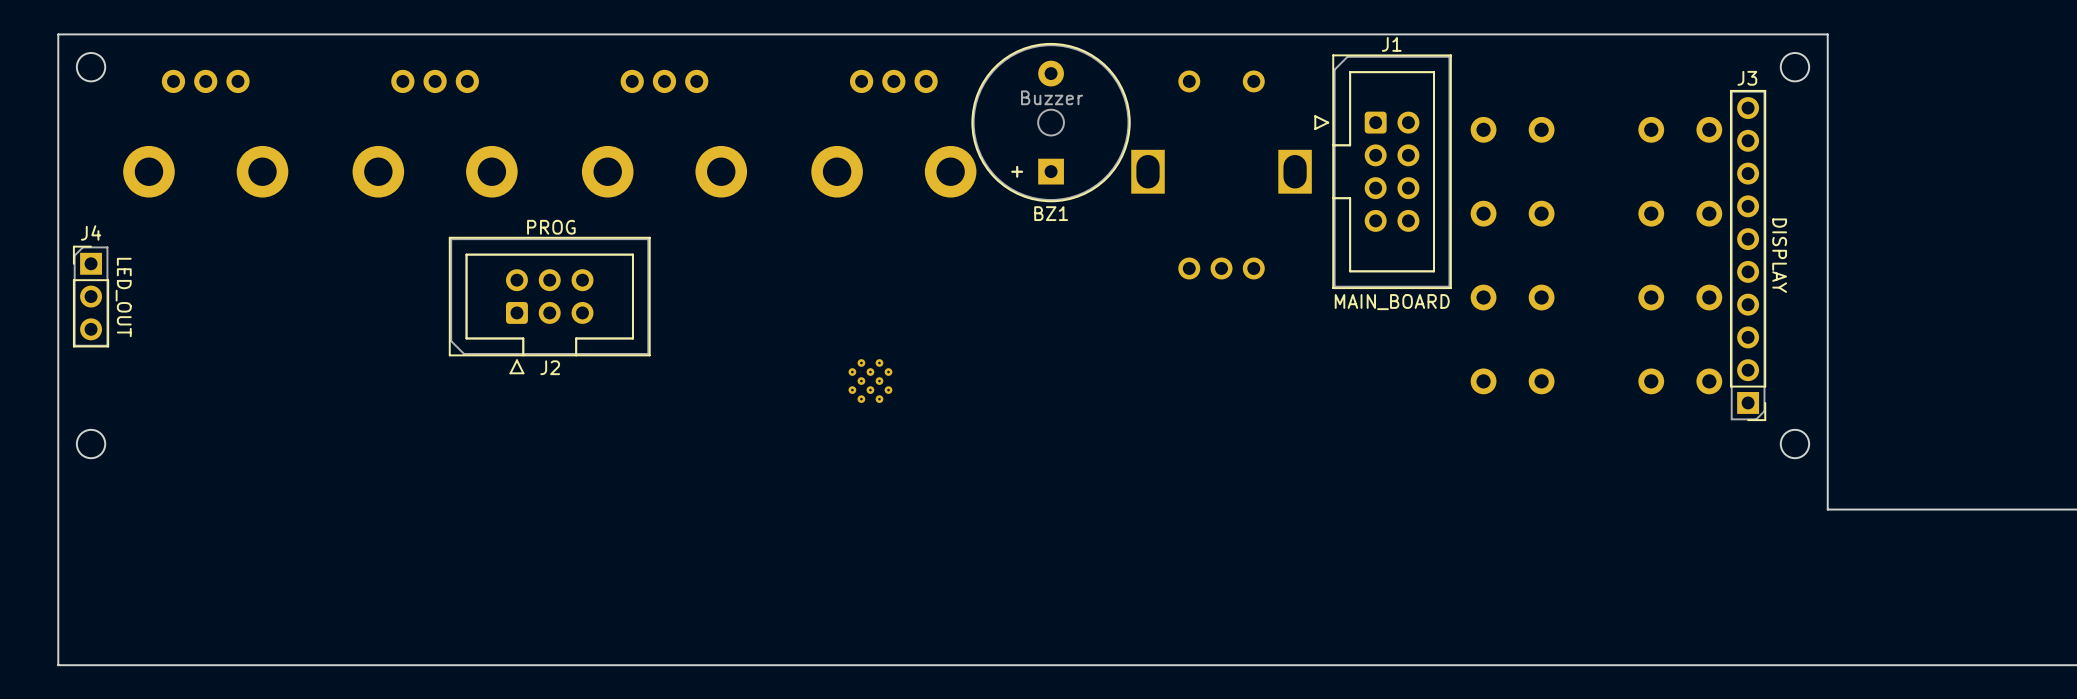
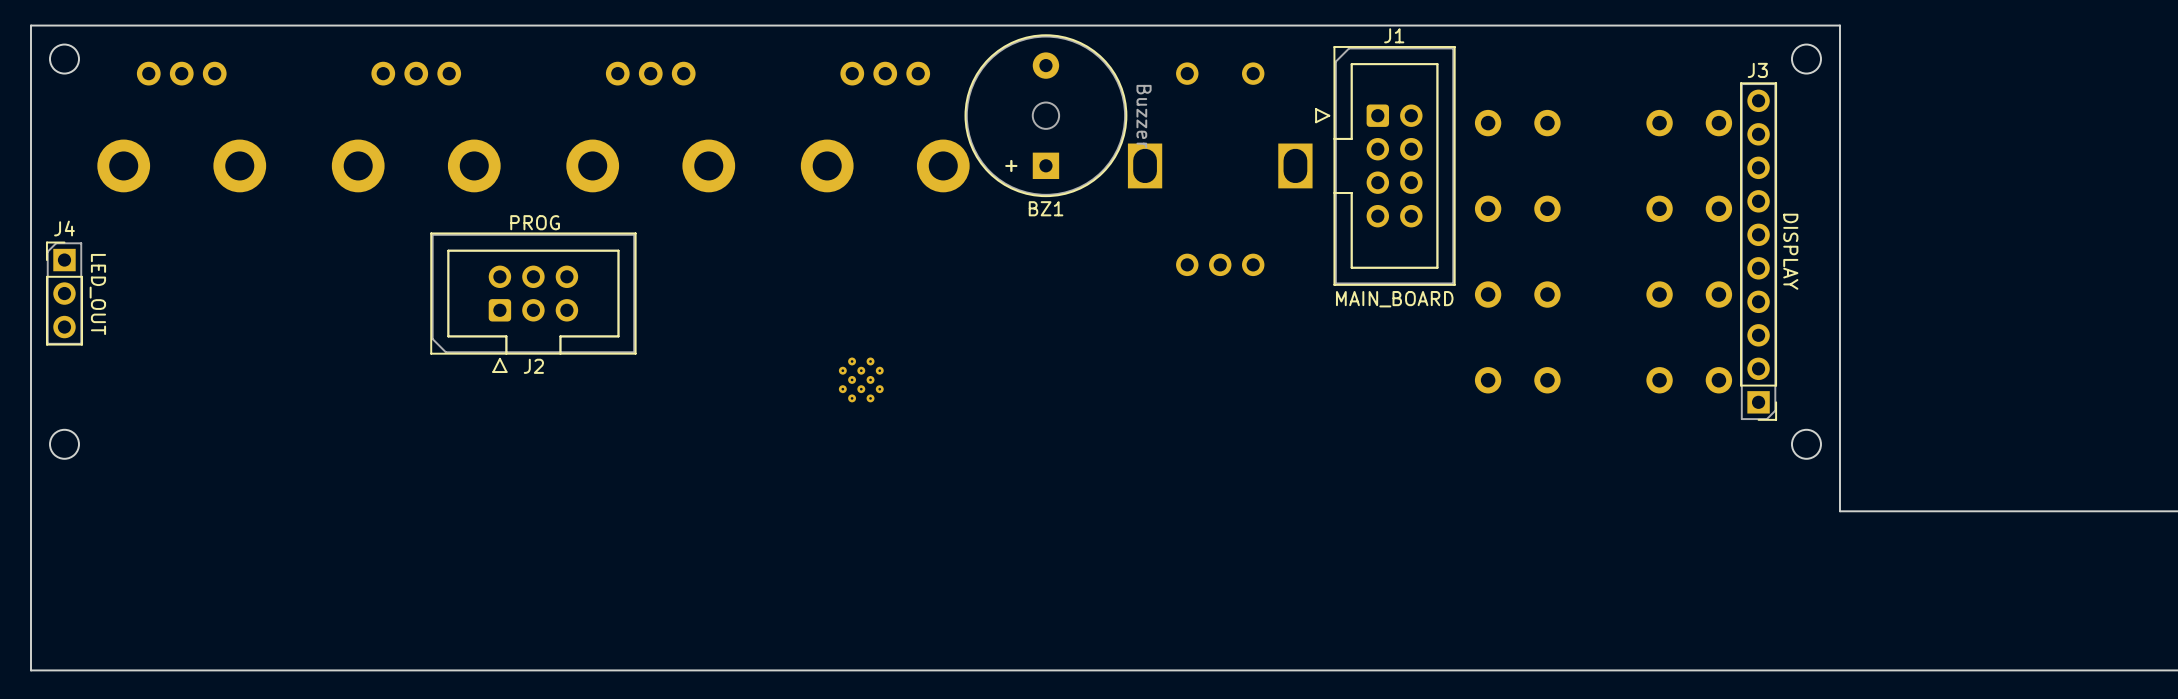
BZ1 value rotation: 0° (1052, 97) -> 90° clockwise (1144, 116)
BZ1 value position: Buzzer (1052, 97) -> Buzzer (1144, 116)

